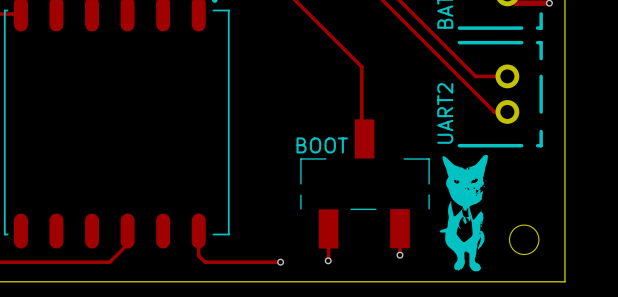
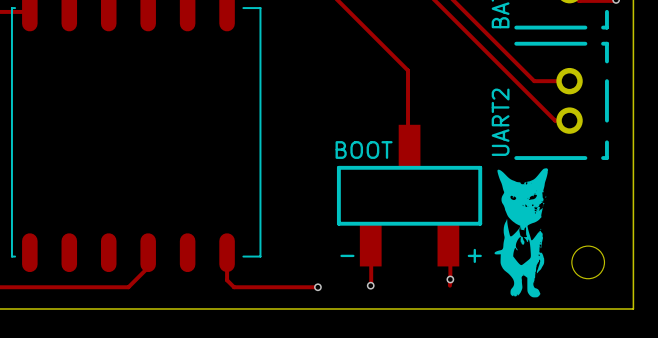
BOOT footprint: [300, 119, 430, 249] -> [336, 124, 483, 267]
text: none -> - (347, 255)
text: none -> + (474, 255)
top track: none -> (450, 279) (449, 285)

